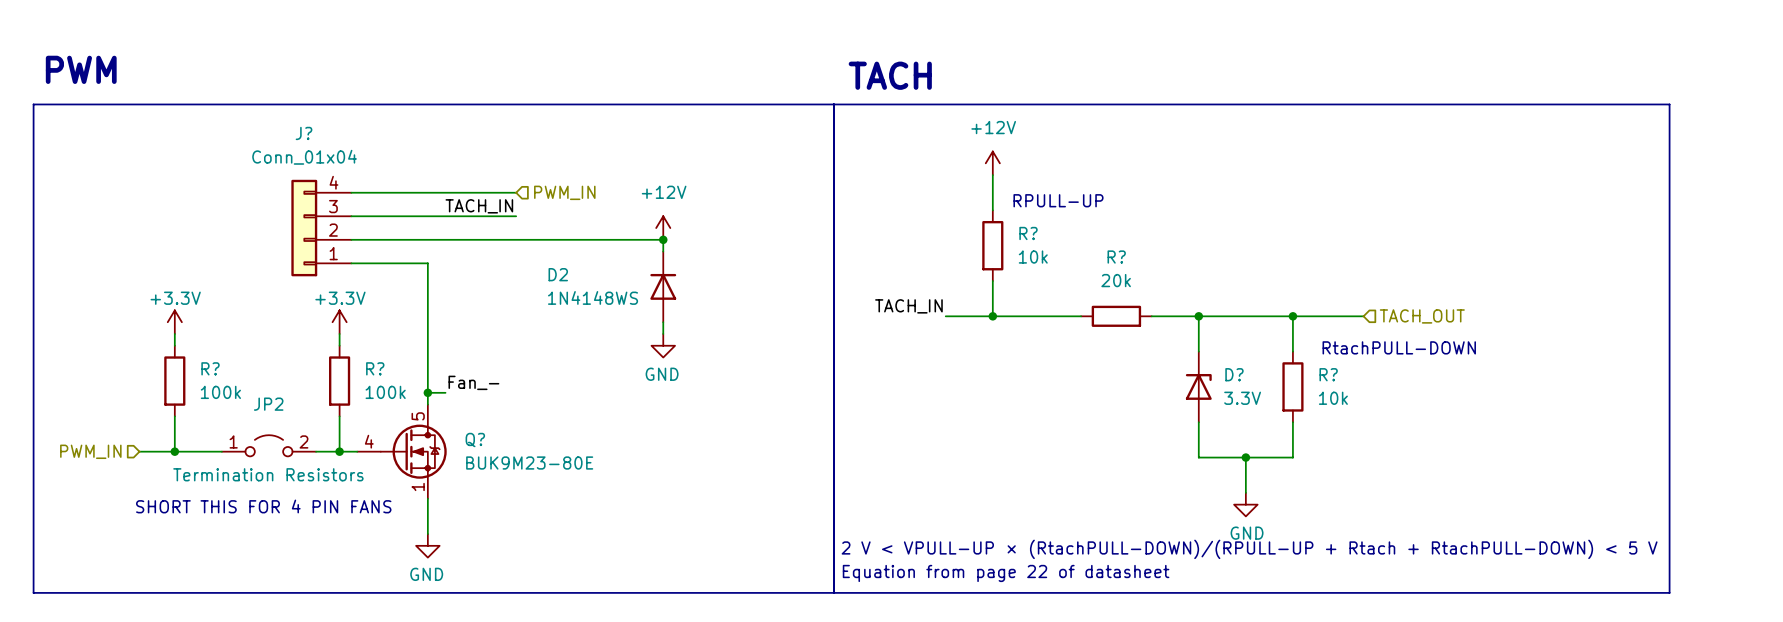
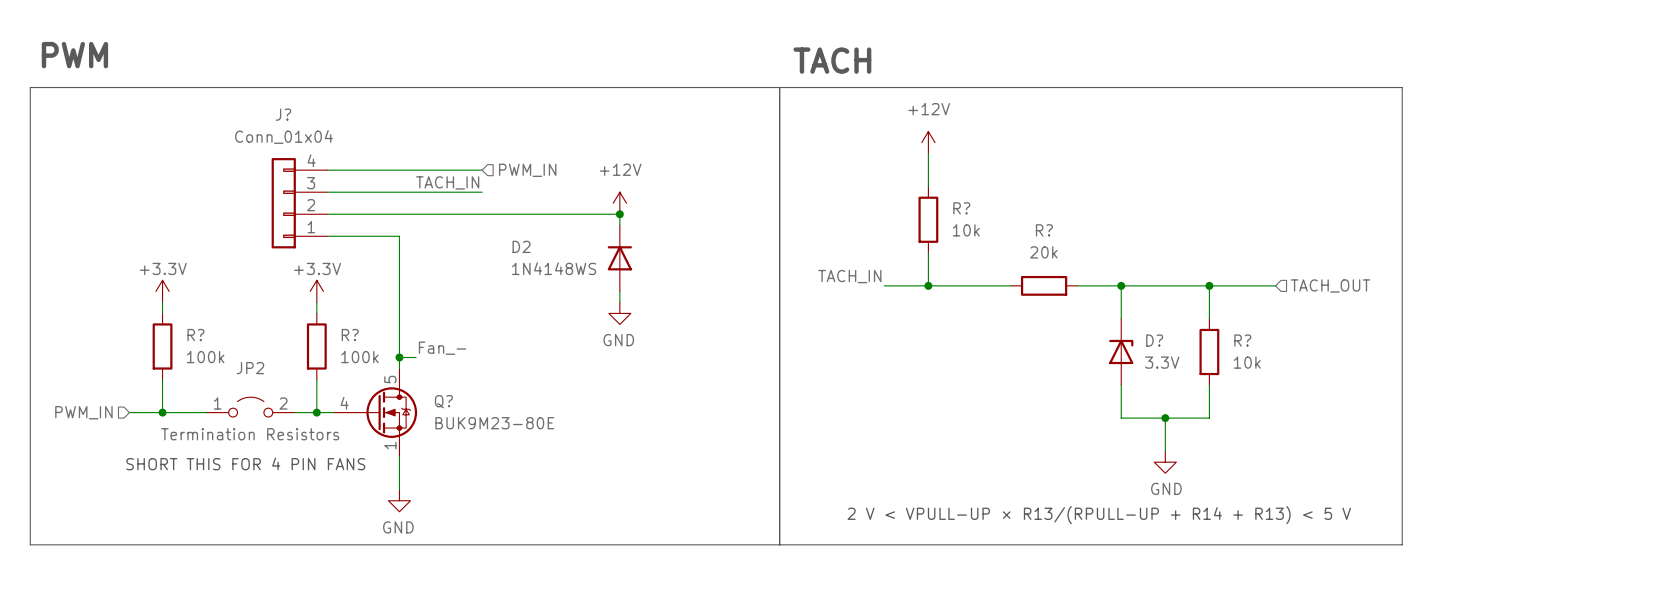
line: (1498, 104) (1669, 104) (1669, 592) (1498, 592) -> (1402, 87) (1402, 544)
text: RPULL-UP (1058, 200) -> none
text: RtachPULL-DOWN (1399, 347) -> none
text: 2 V < VPULL-UP × (RtachPULL-DOWN)/(RPULL-UP + Rtach + RtachPULL-DOWN) < 5 V (1249, 549) -> 2 V < VPULL-UP × R13/(RPULL-UP + R14 + R13) < 5 V (1099, 515)
text: Equation from page 22 of datasheet (1006, 573) -> none

